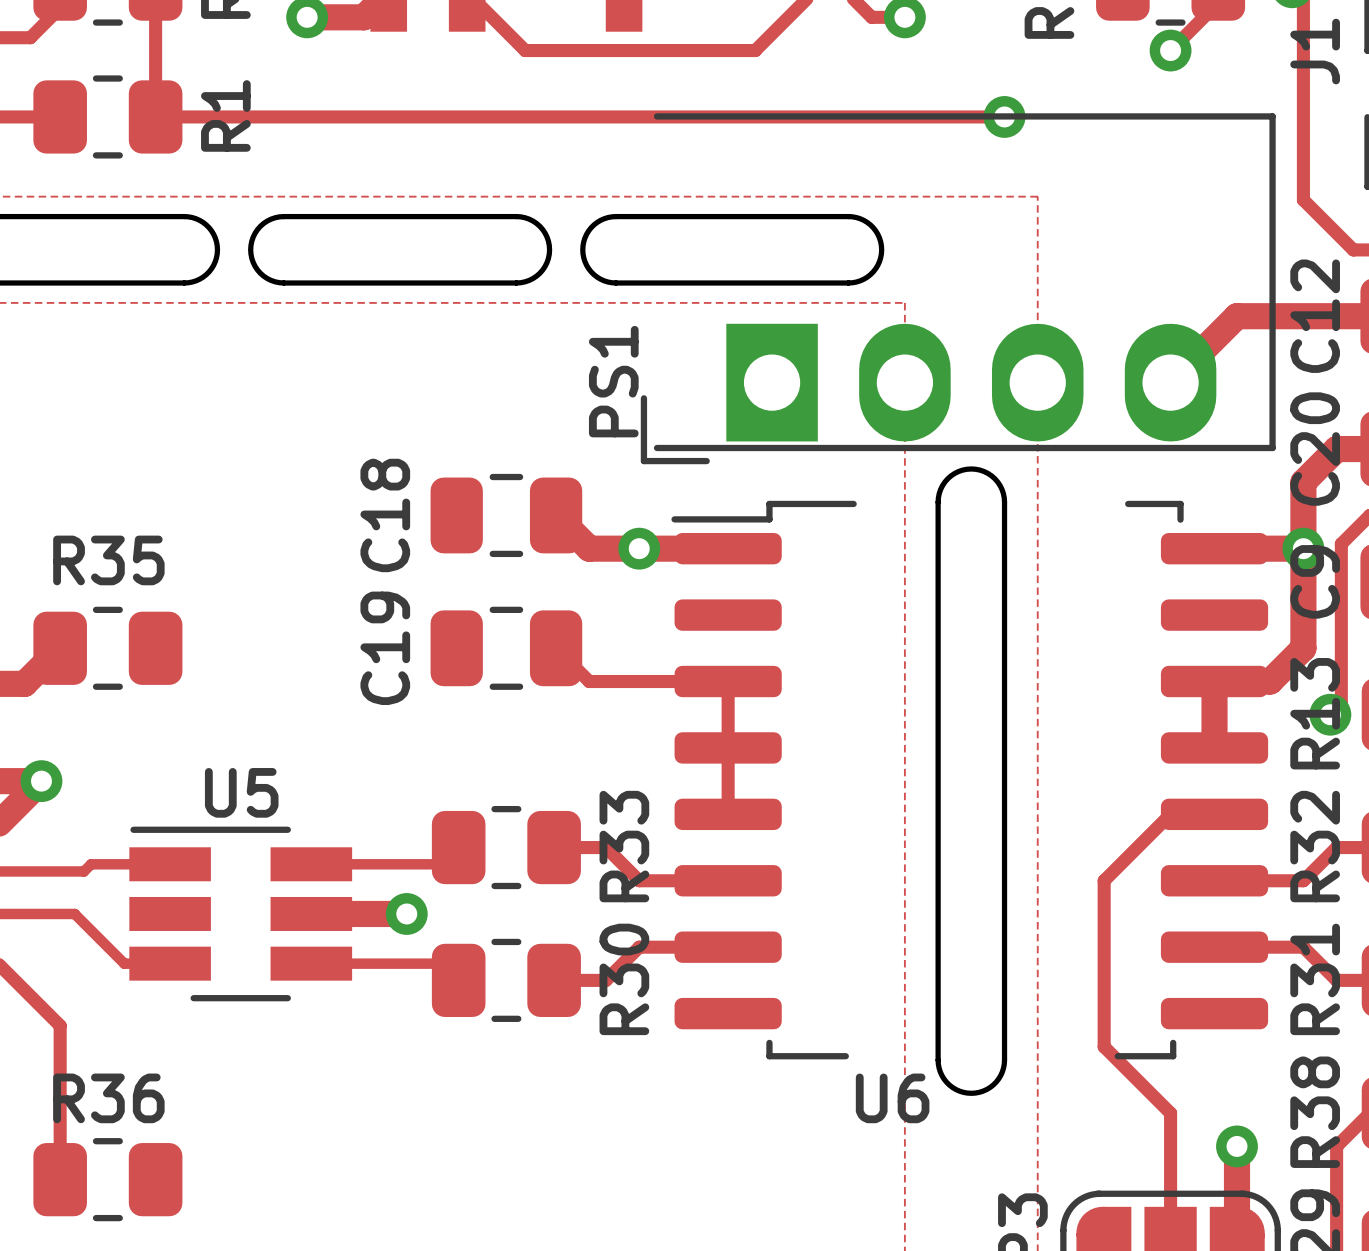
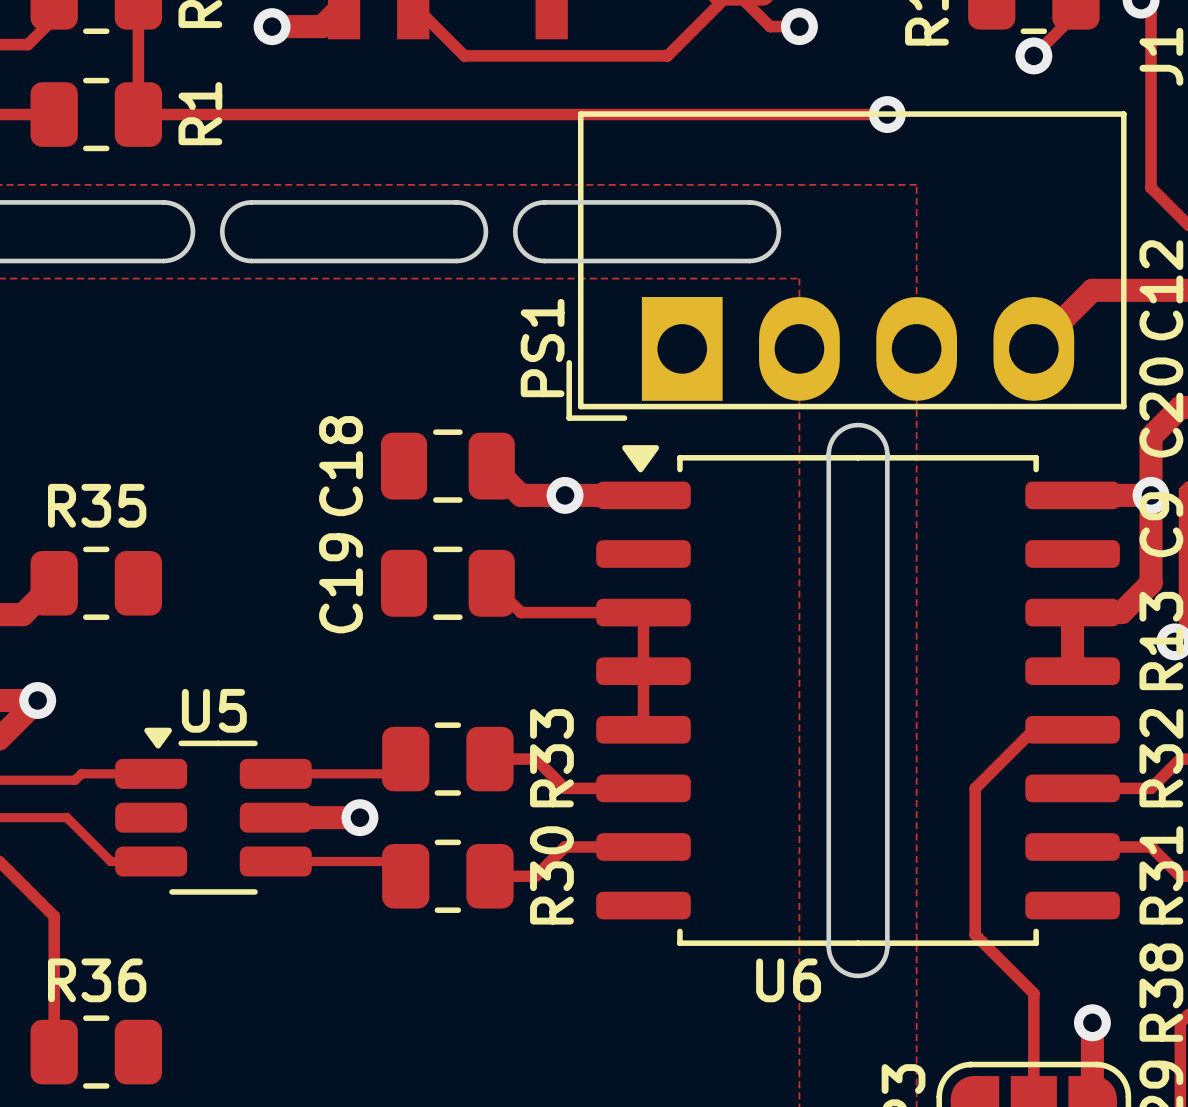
PS1 footprint: [640, 113, 1276, 465] -> [566, 111, 1127, 421]
U6 footprint: [671, 500, 1269, 1060] -> [596, 445, 1120, 946]
U5 footprint: [129, 826, 353, 1002] -> [115, 727, 312, 895]

